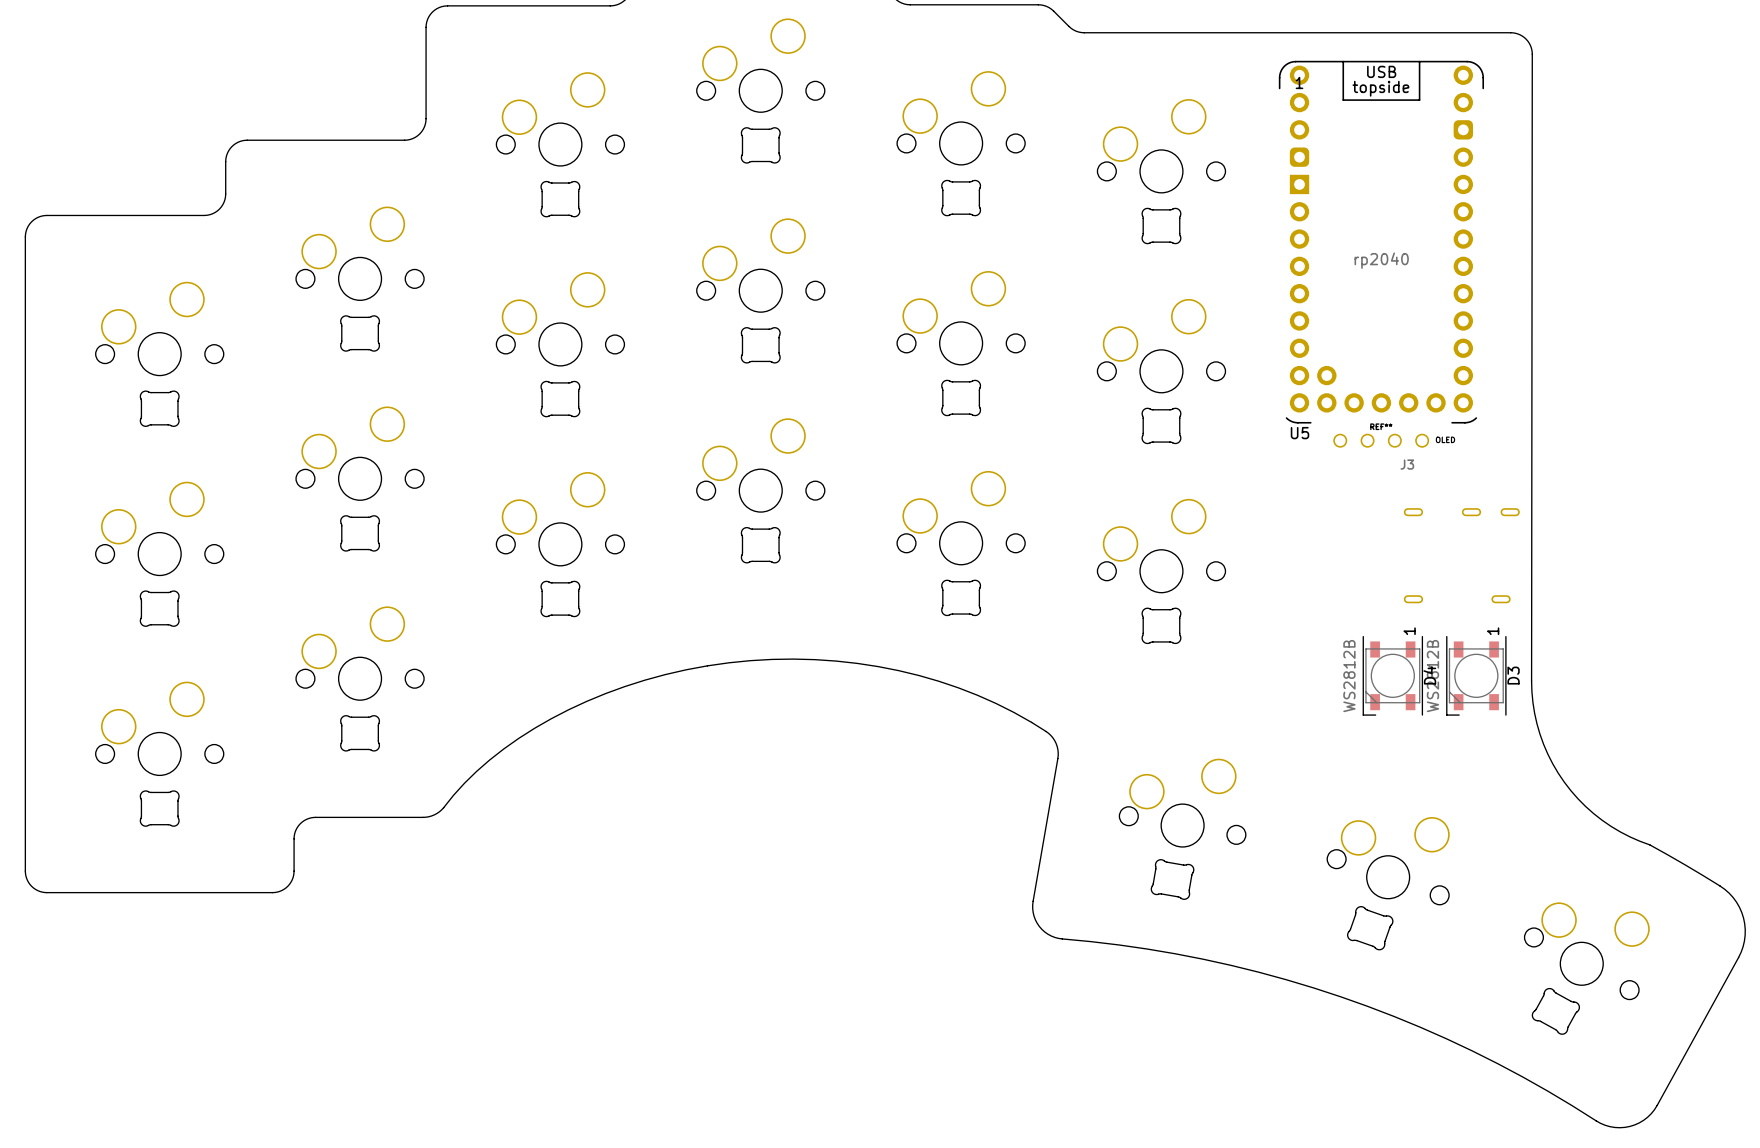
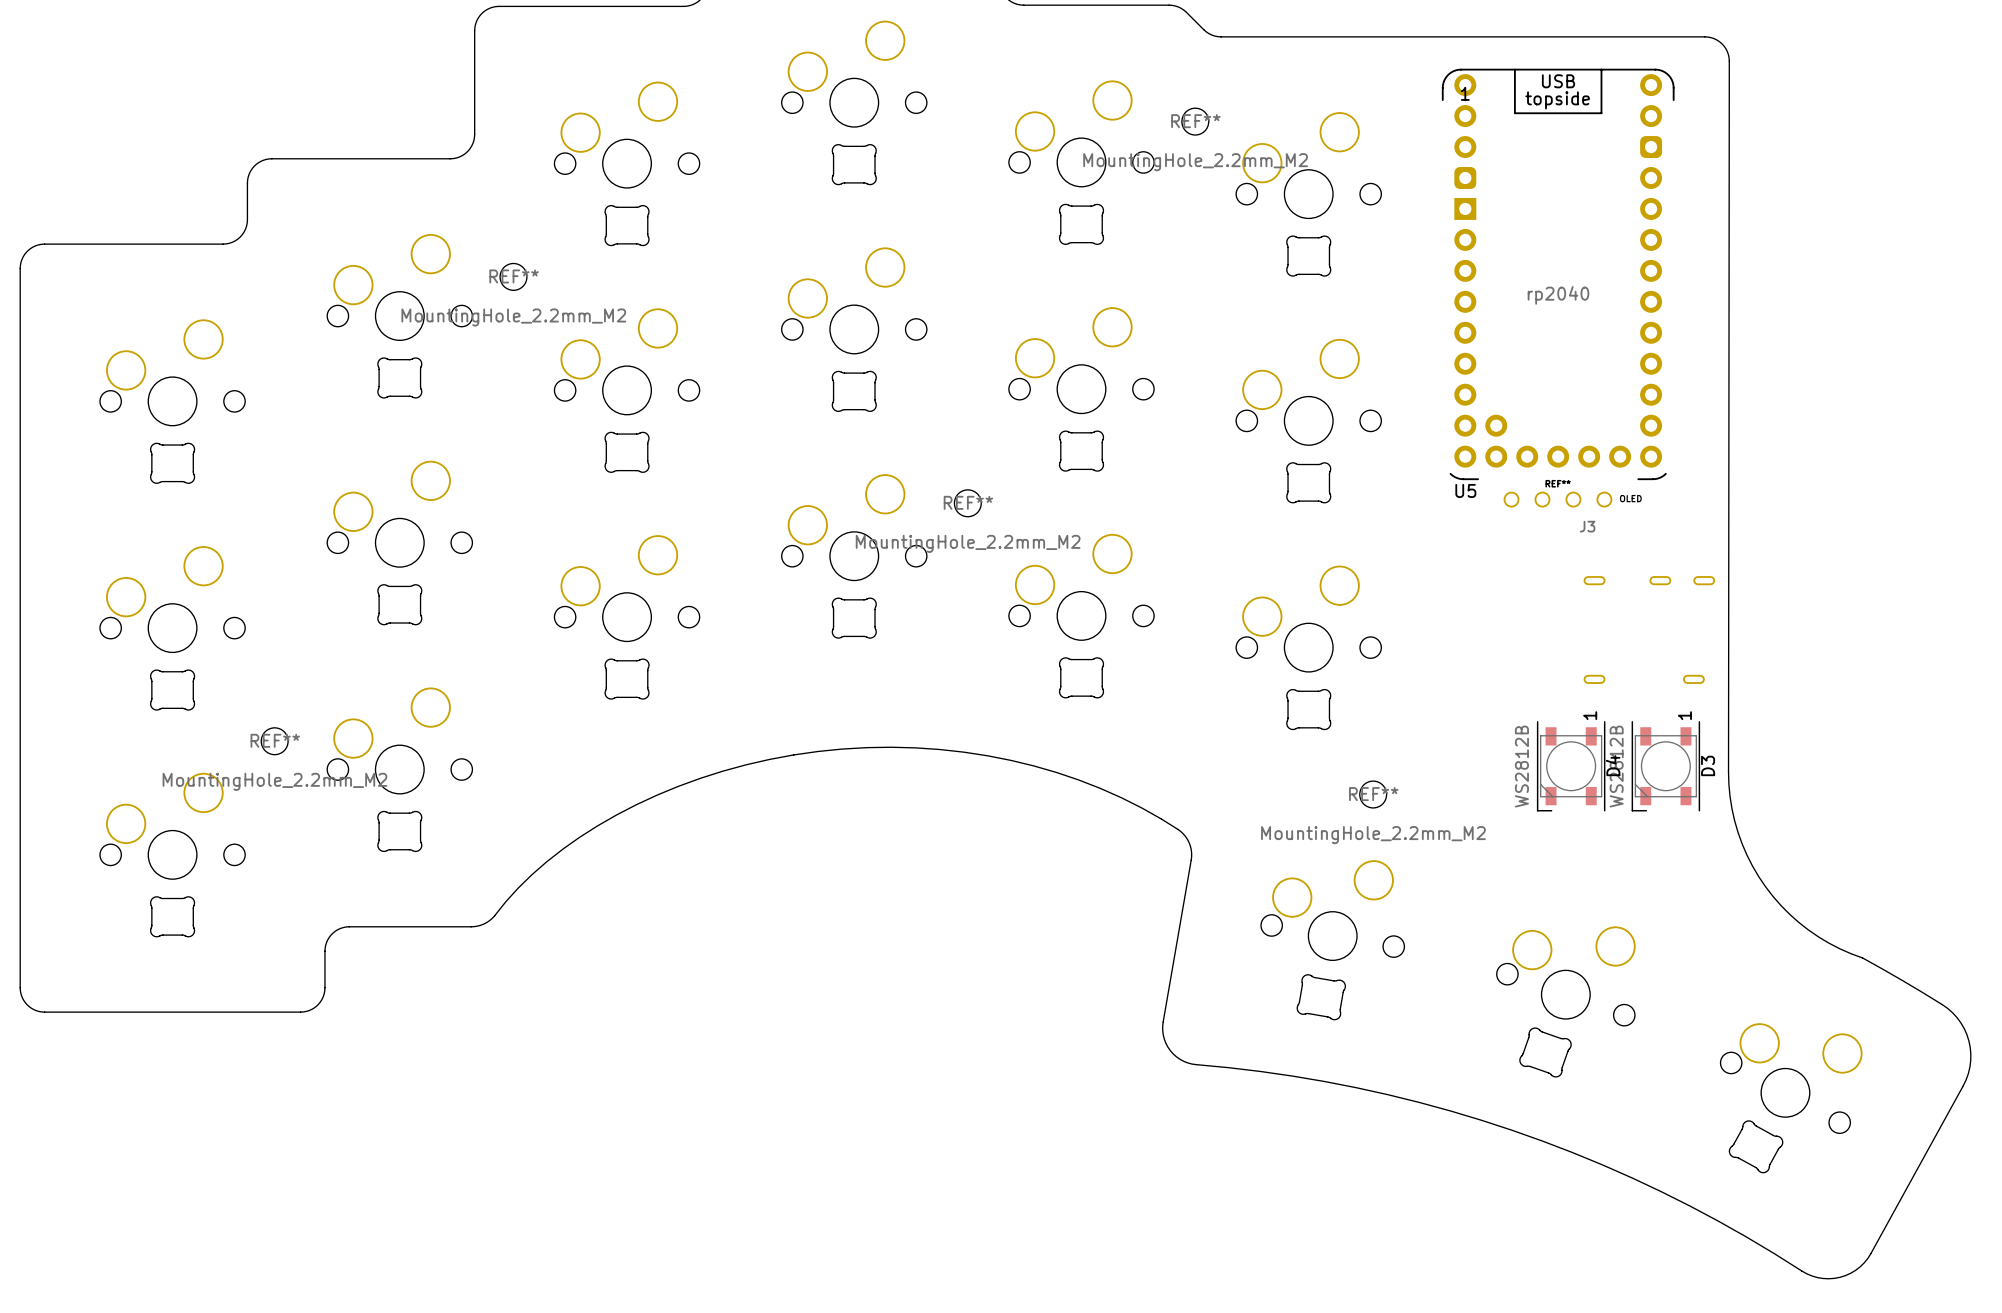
REF**: none -> MountingHole_2.2mm_M2 (1195, 121)
REF**: none -> MountingHole_2.2mm_M2 (513, 276)
REF**: none -> MountingHole_2.2mm_M2 (967, 503)
REF**: none -> MountingHole_2.2mm_M2 (274, 741)
REF**: none -> MountingHole_2.2mm_M2 (1373, 794)

